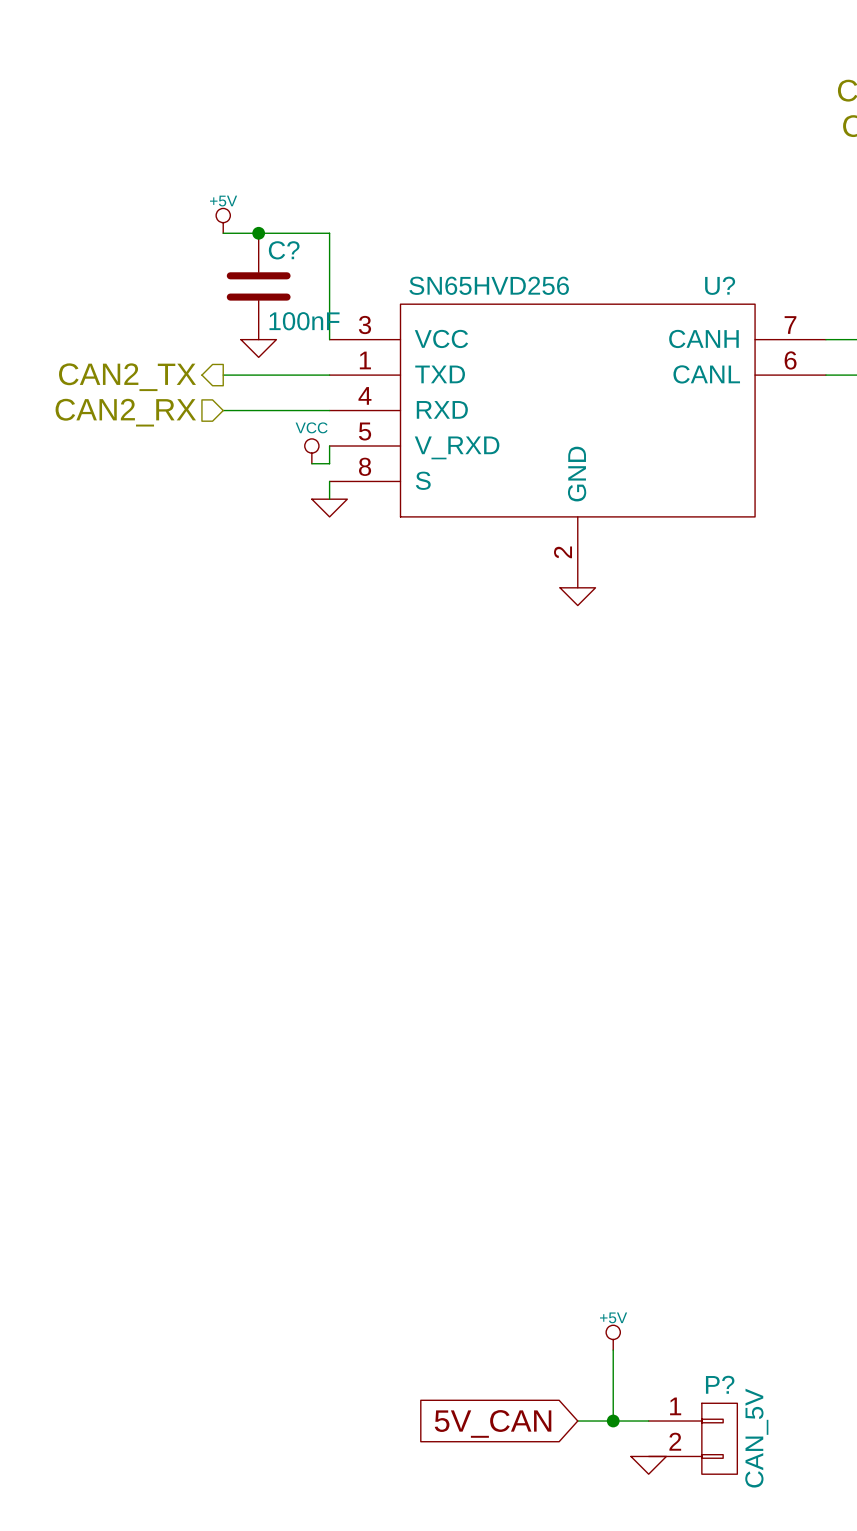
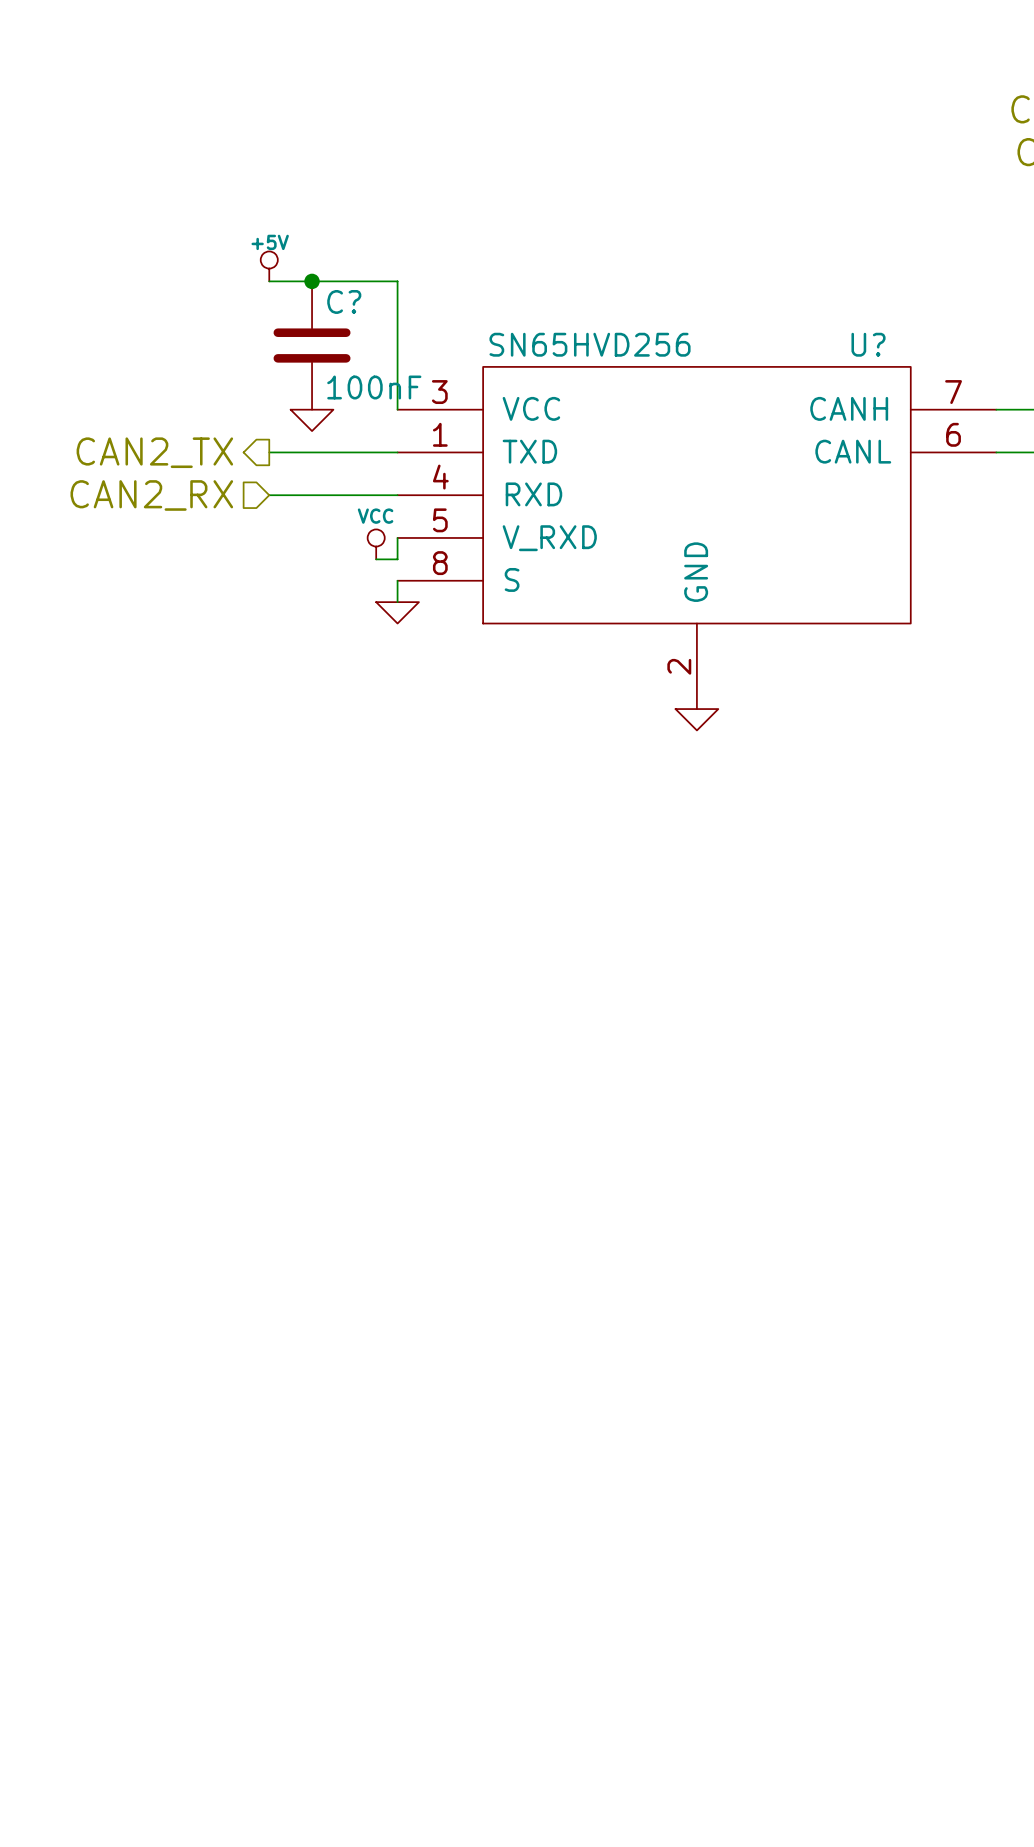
power symbol: +5V (613, 1337) -> none
wire: (613, 1350) (613, 1421) -> none
wire: (577, 1421) (648, 1421) -> none
junction: (613, 1421) -> none
global label: 5V_CAN (493, 1423) -> none
P?: CAN_5V (693, 1438) -> none
power symbol: (648, 1465) -> none

